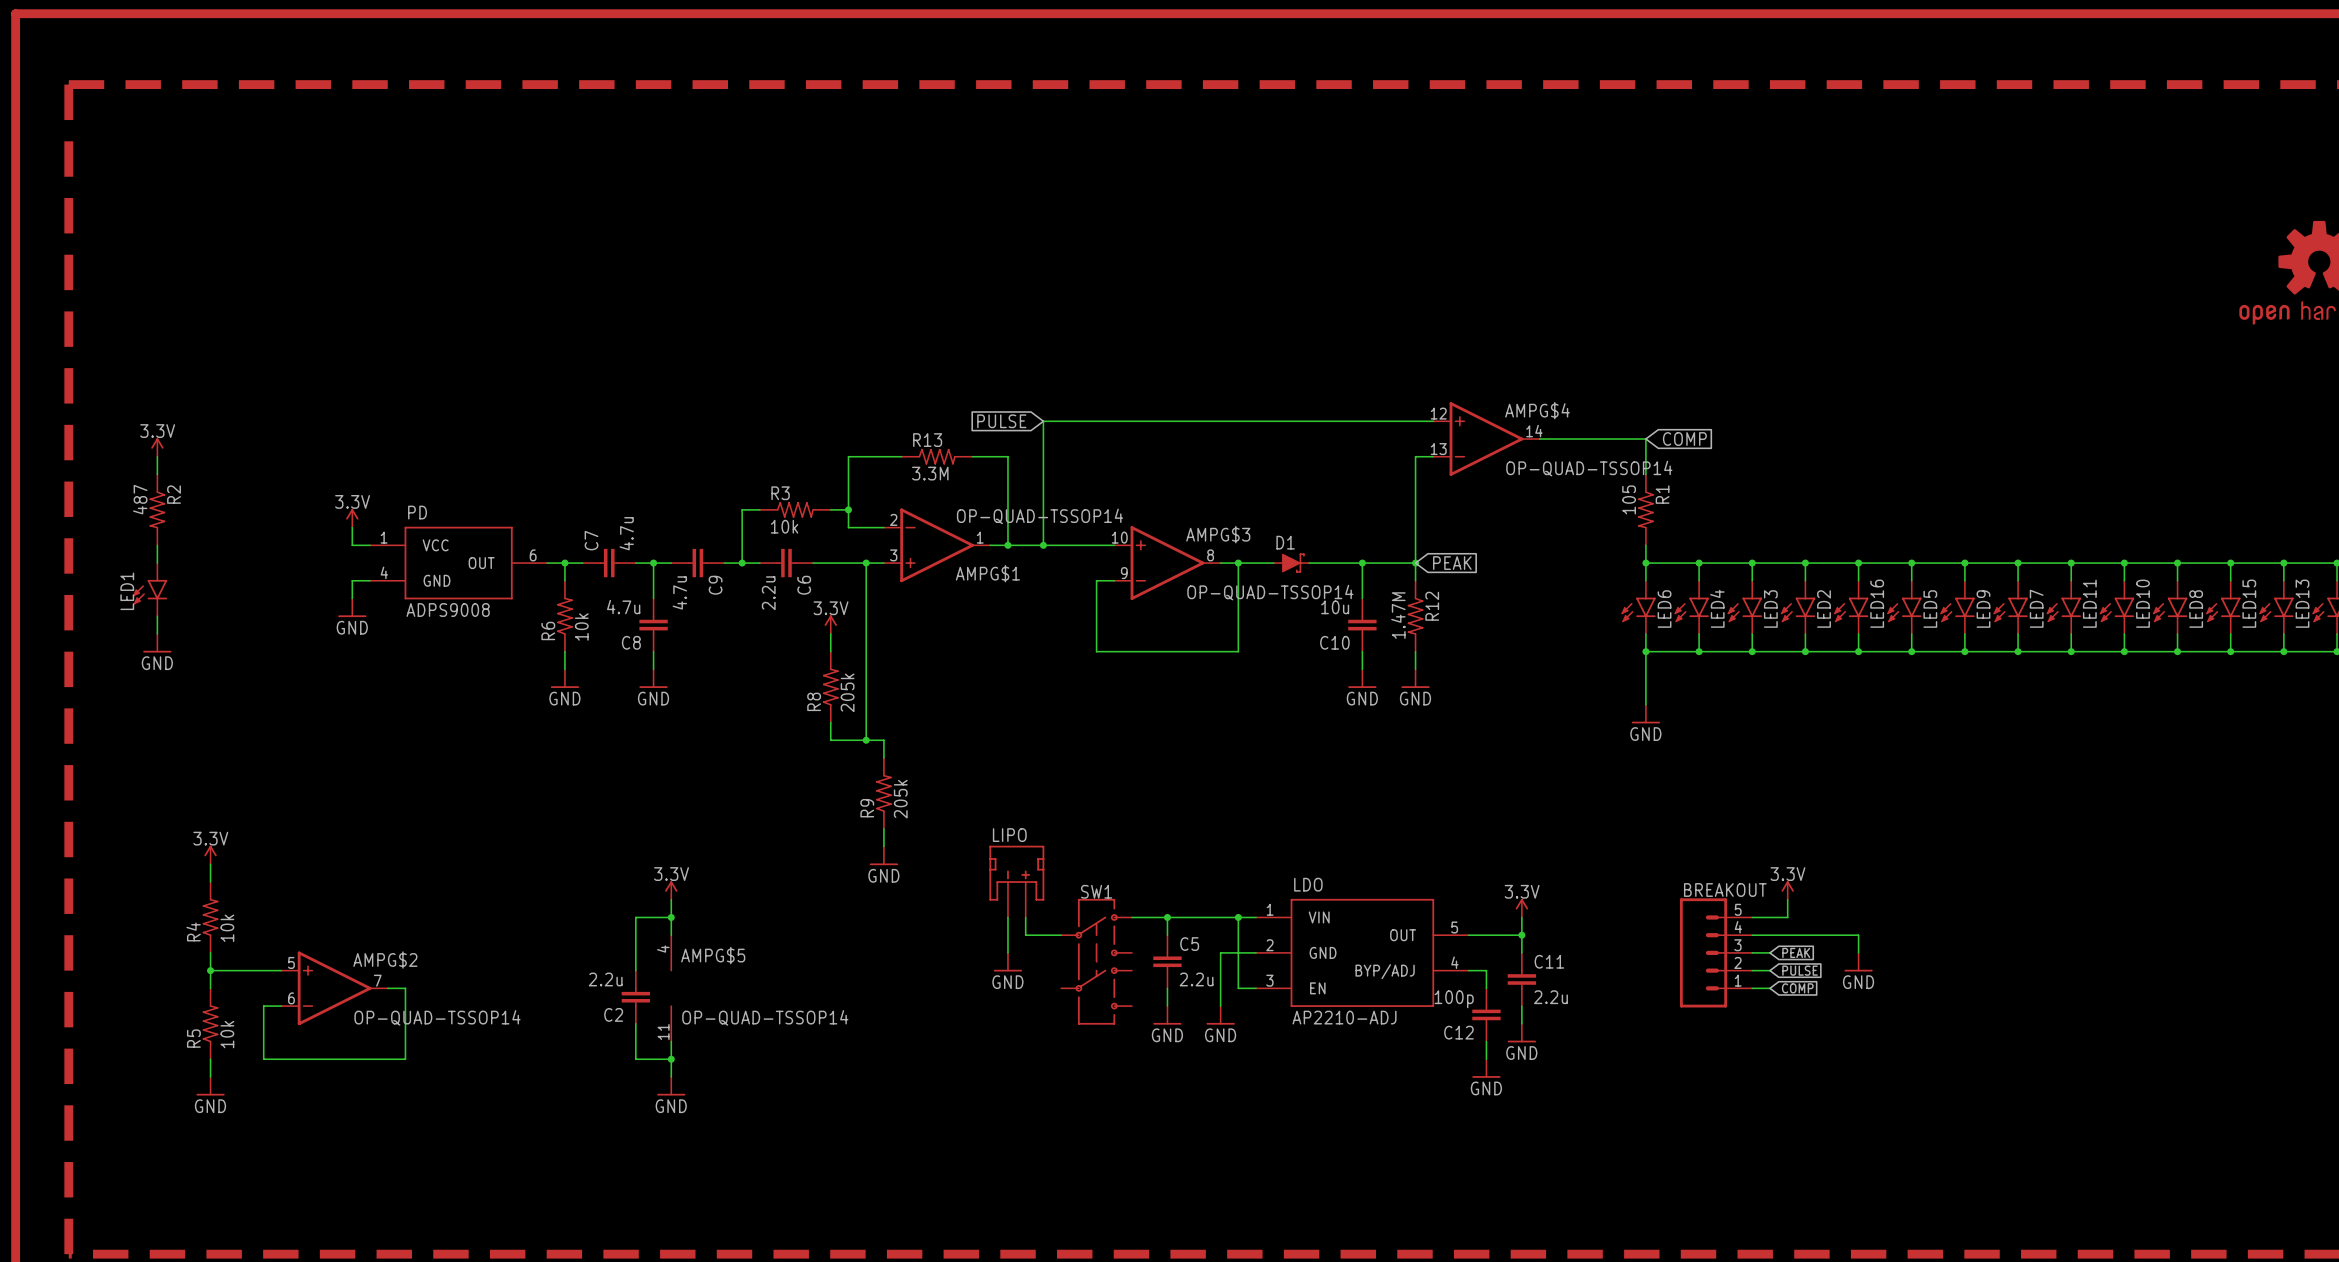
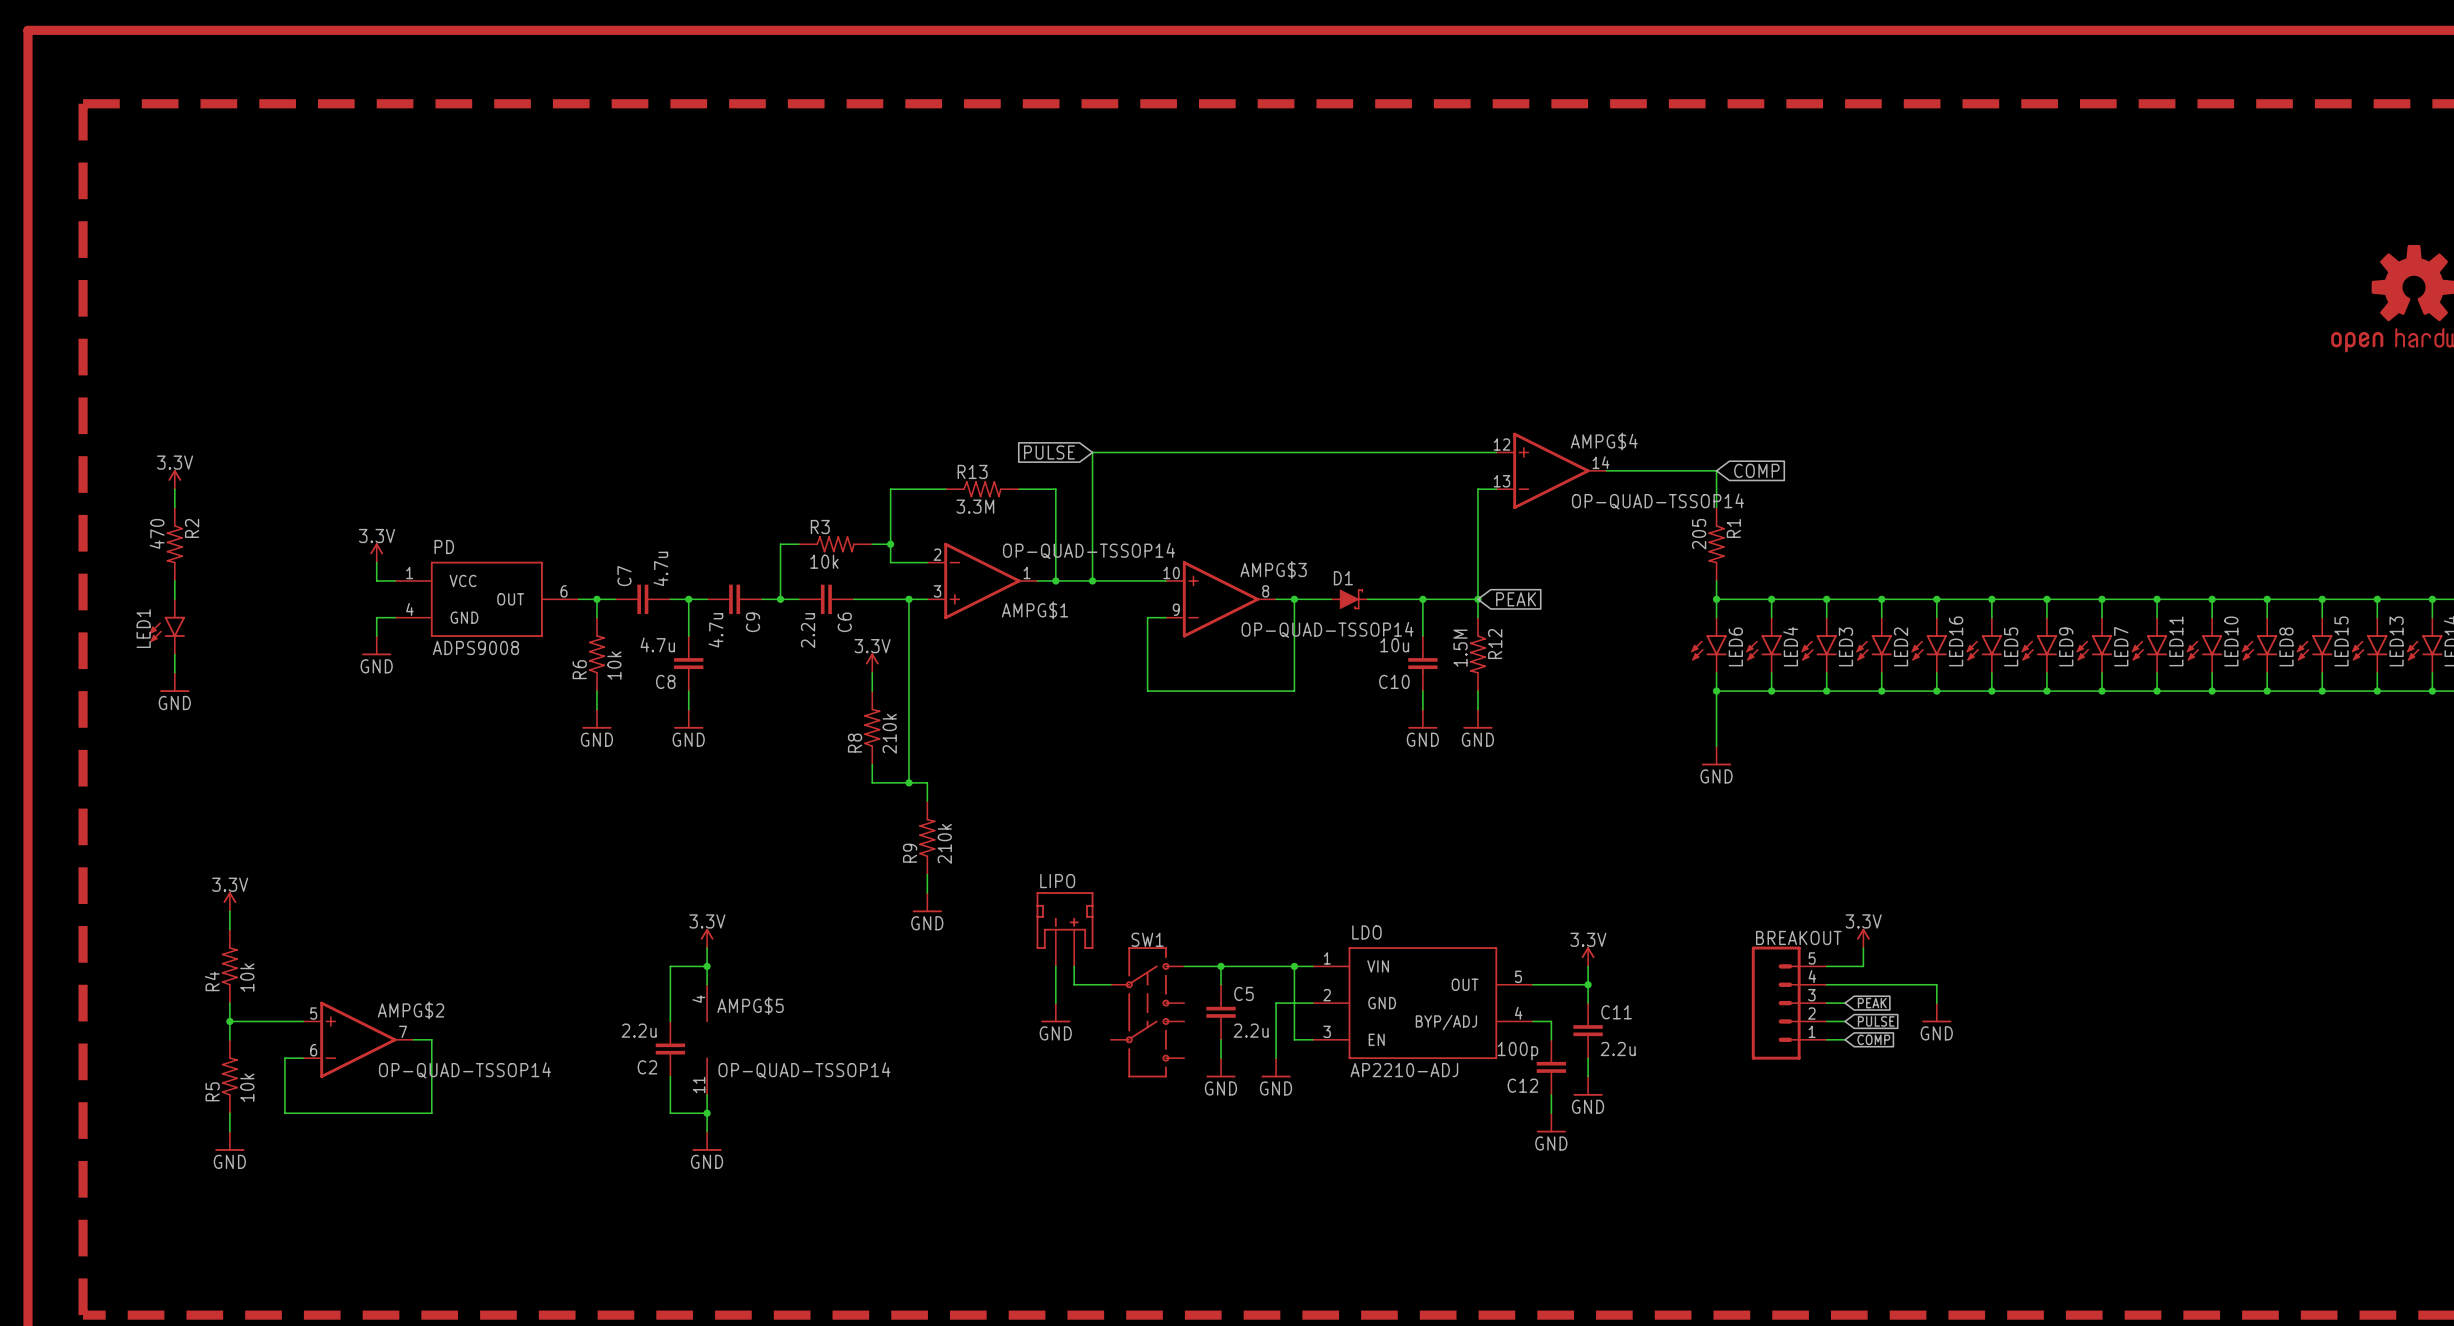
R2 value: 487 (140, 499) -> 470 (157, 533)
R1 value: 105 (1629, 499) -> 205 (1699, 534)
R12 value: 1.47M (1398, 615) -> 1.5M (1460, 648)
R8 value: 205k (847, 692) -> 210k (889, 733)
R9 value: 205k (900, 799) -> 210k (944, 843)

